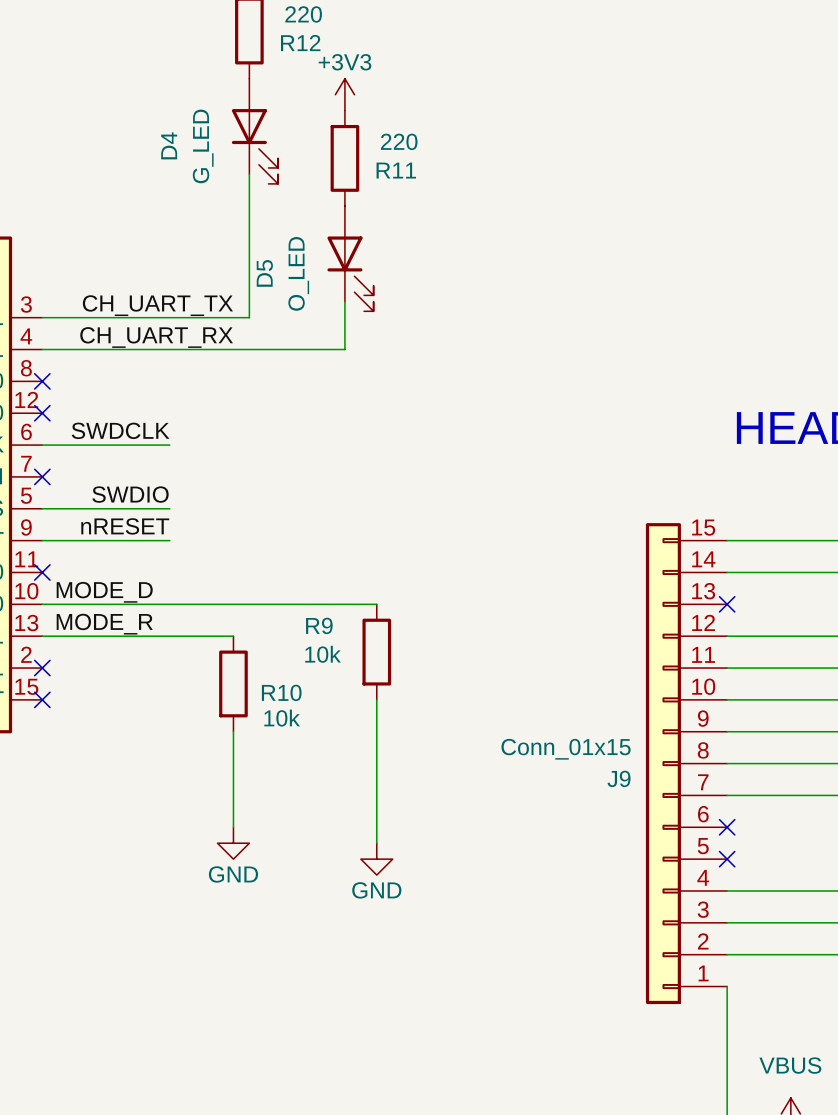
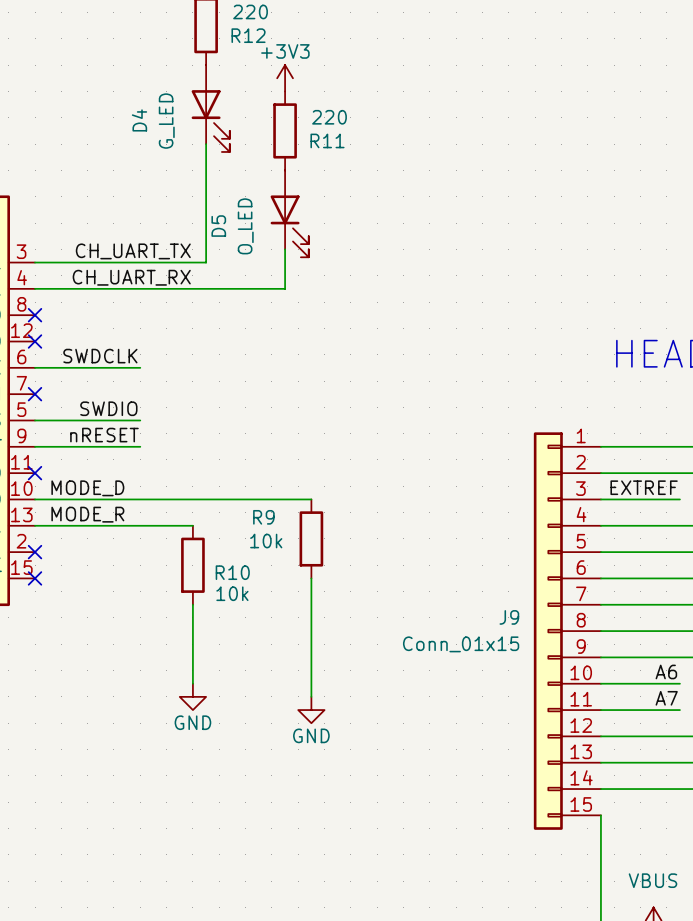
label: none -> EXTREF (644, 487)
wire: none -> (600, 499) (679, 499)
no-connect mark: (727, 604) -> none
J9 flip: as is (663, 763) -> up-down (548, 631)
label: none -> A6 (666, 671)
wire: none -> (600, 683) (679, 683)
no-connect mark: (727, 827) -> none
label: none -> A7 (666, 698)
wire: none -> (600, 710) (679, 710)
no-connect mark: (727, 859) -> none

